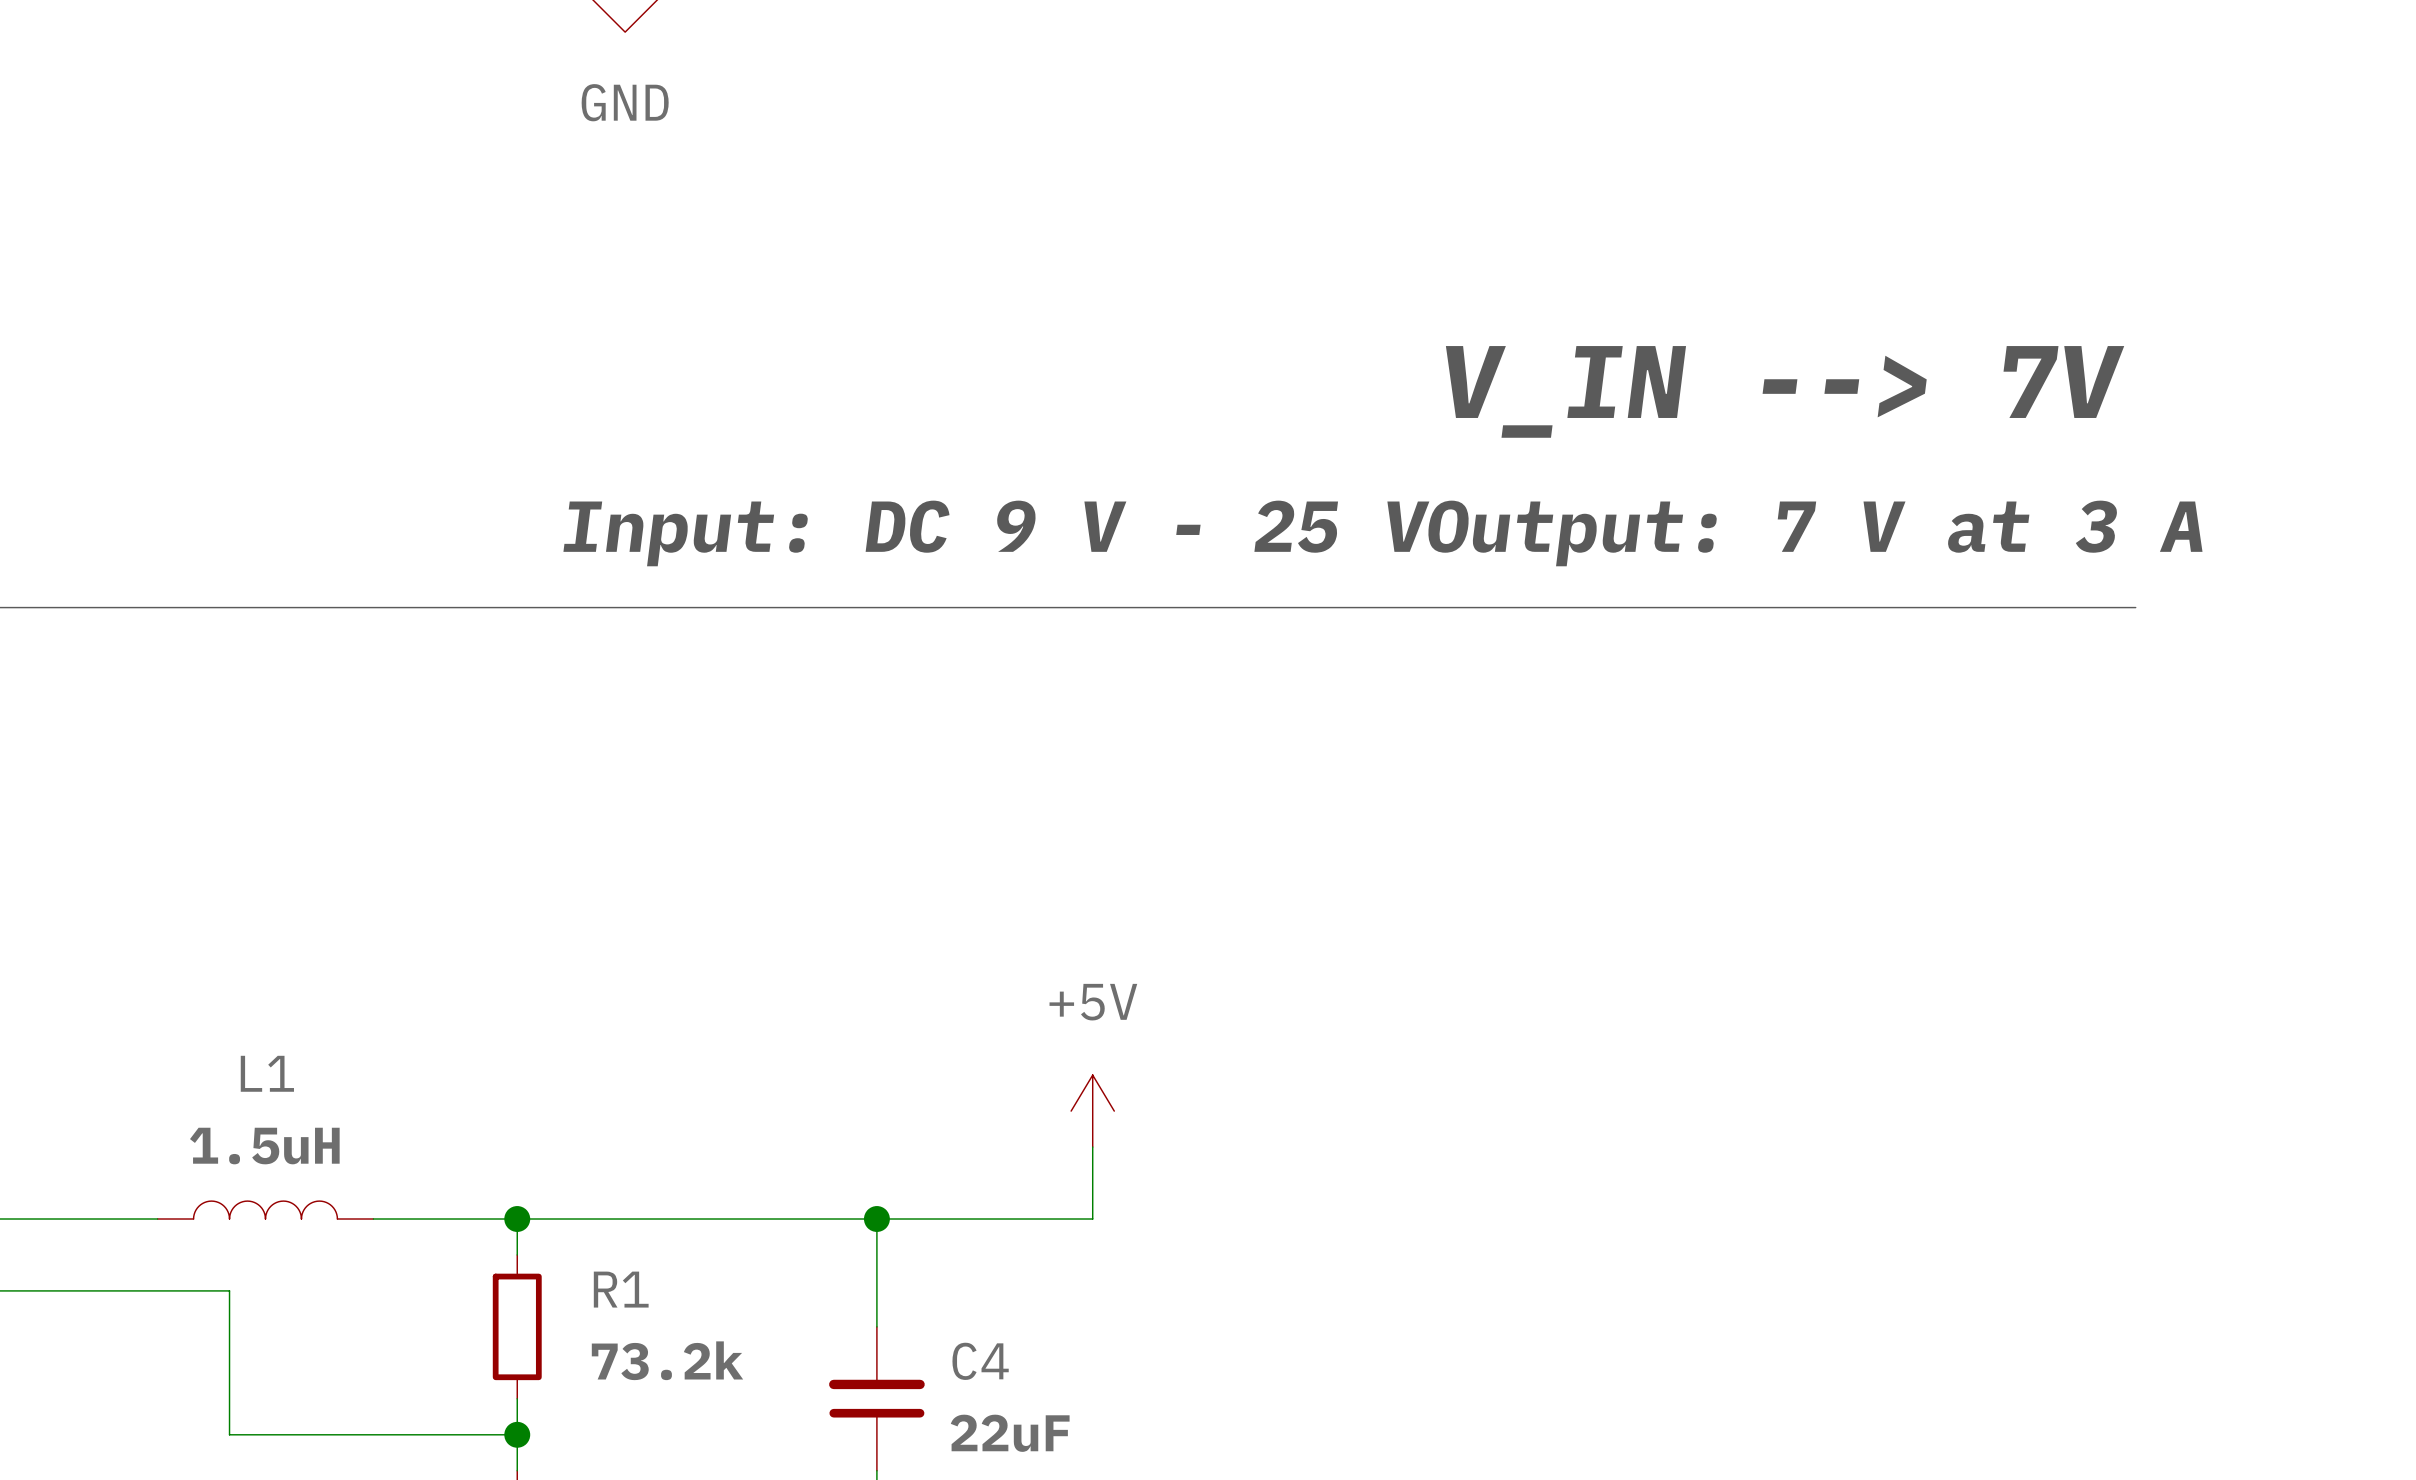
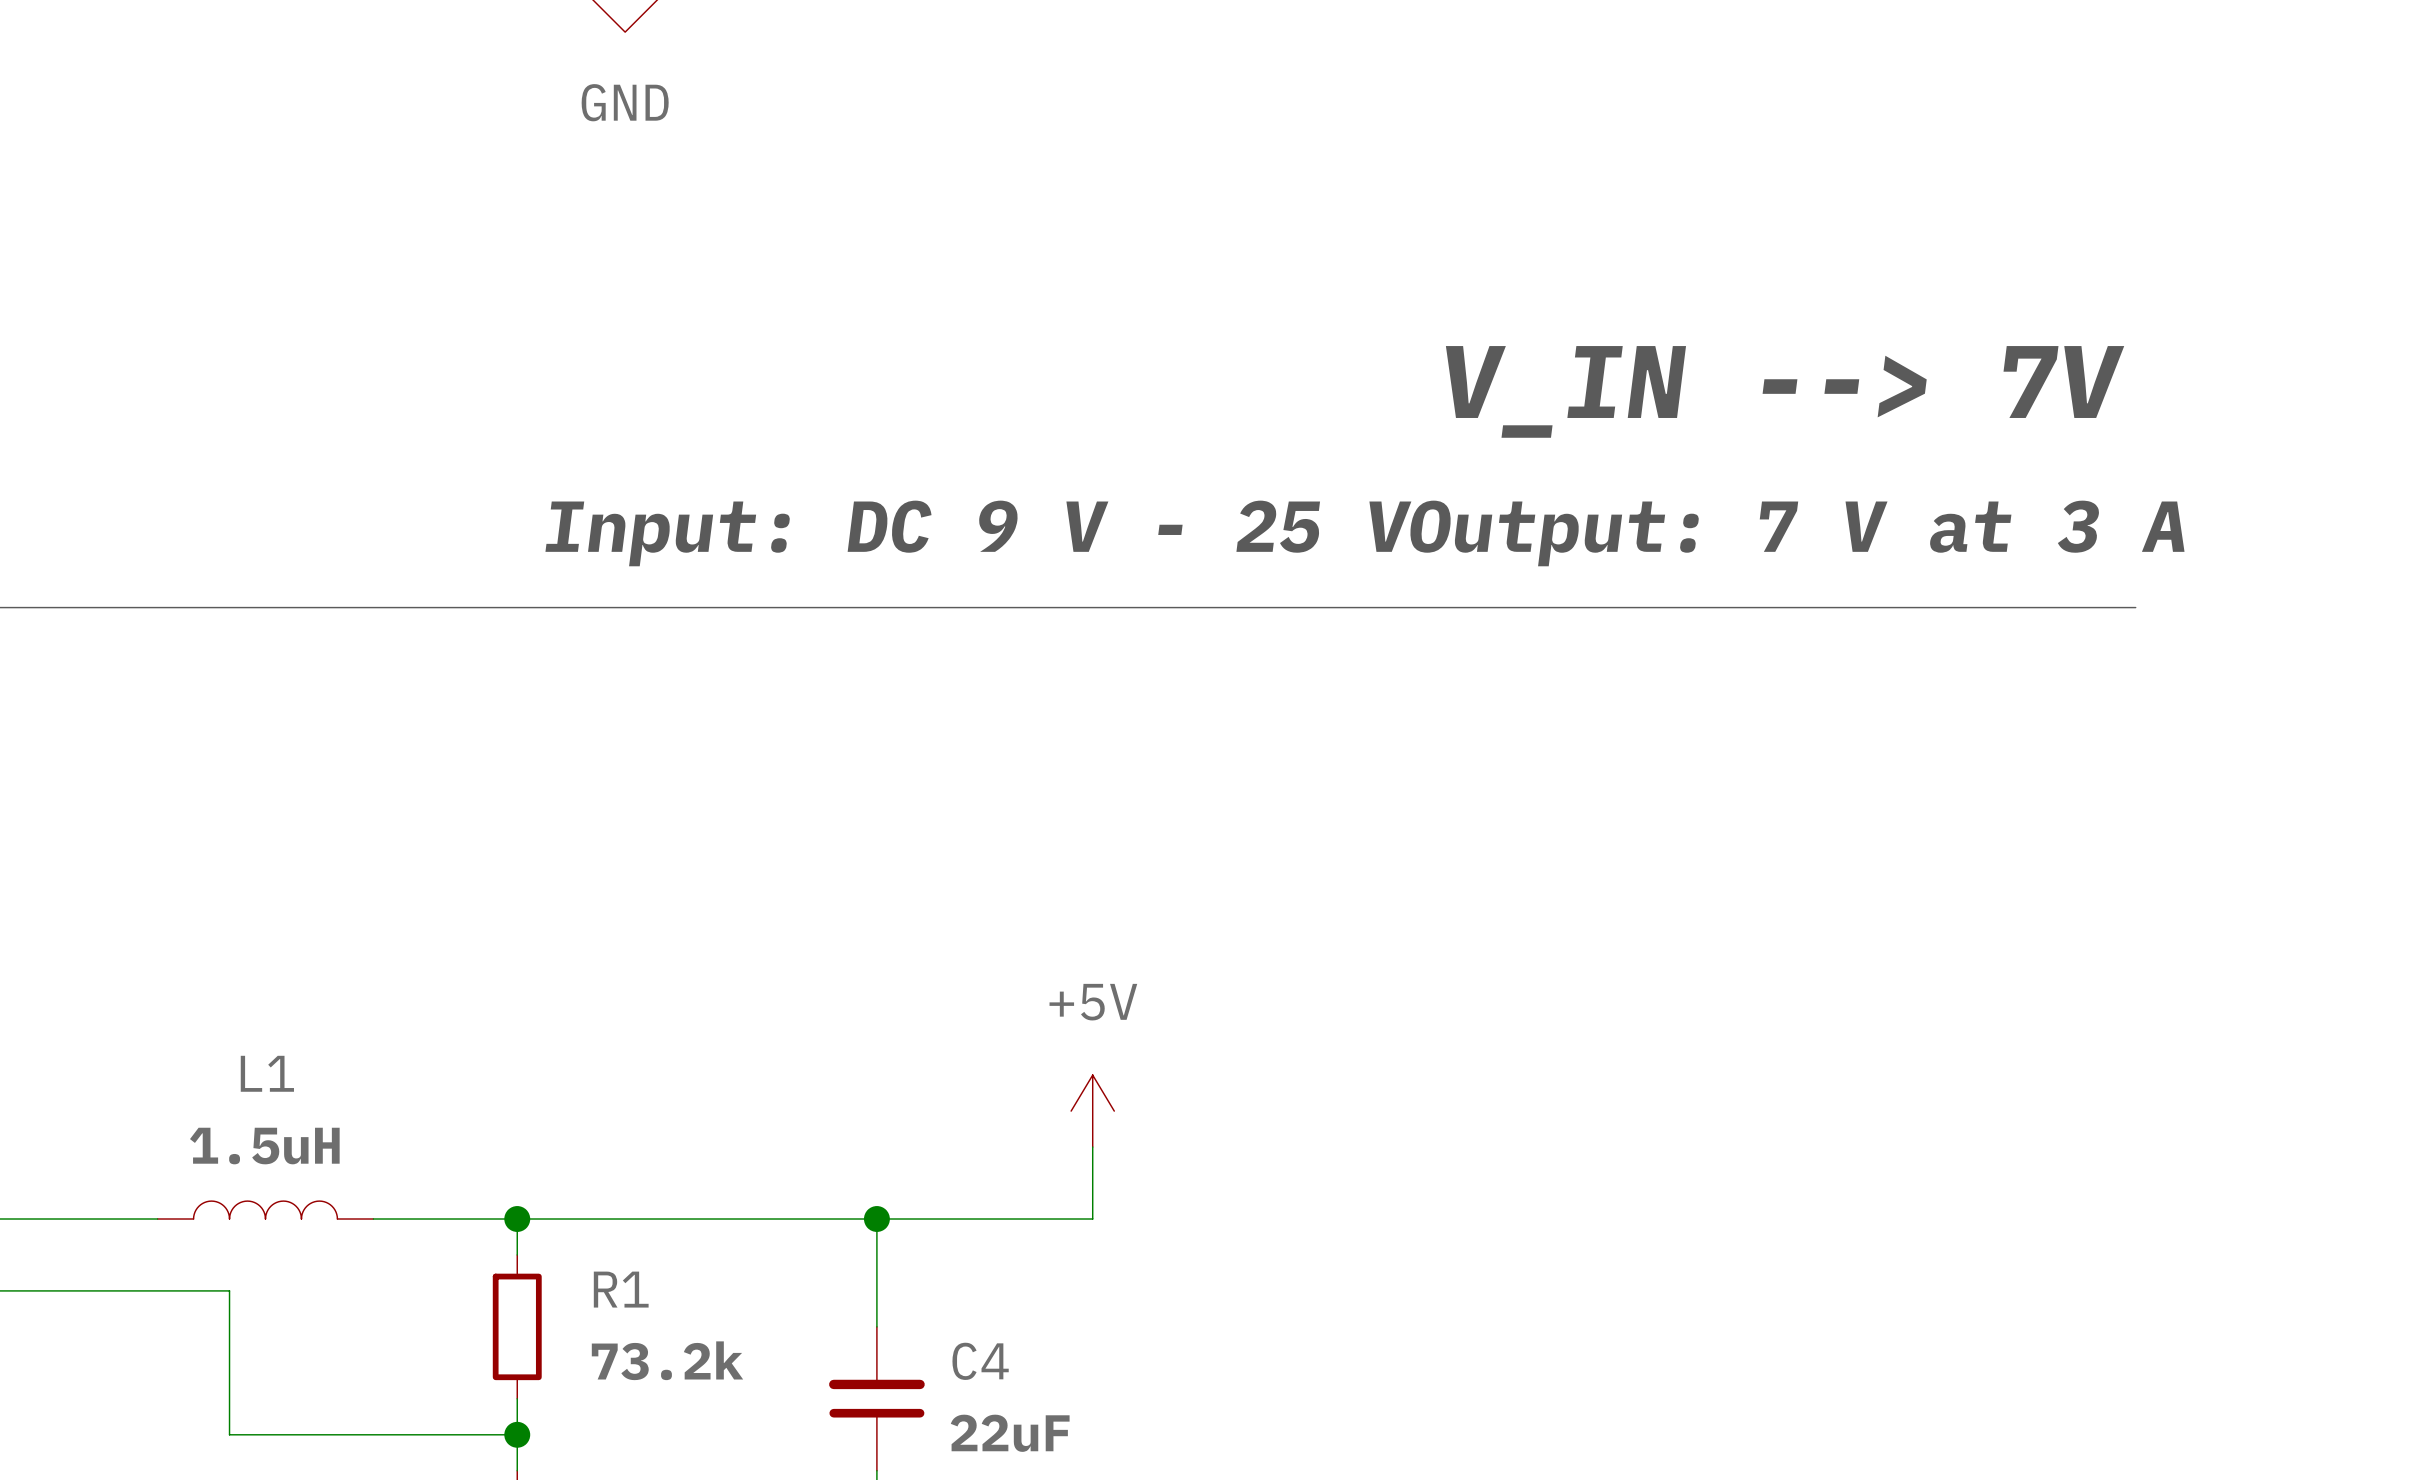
text position: Input: DC 9 V - 25 VOutput: 7 V at 3 A (1382, 533) -> Input: DC 9 V - 25 VOutput: 7 V at 3 A (1364, 533)

